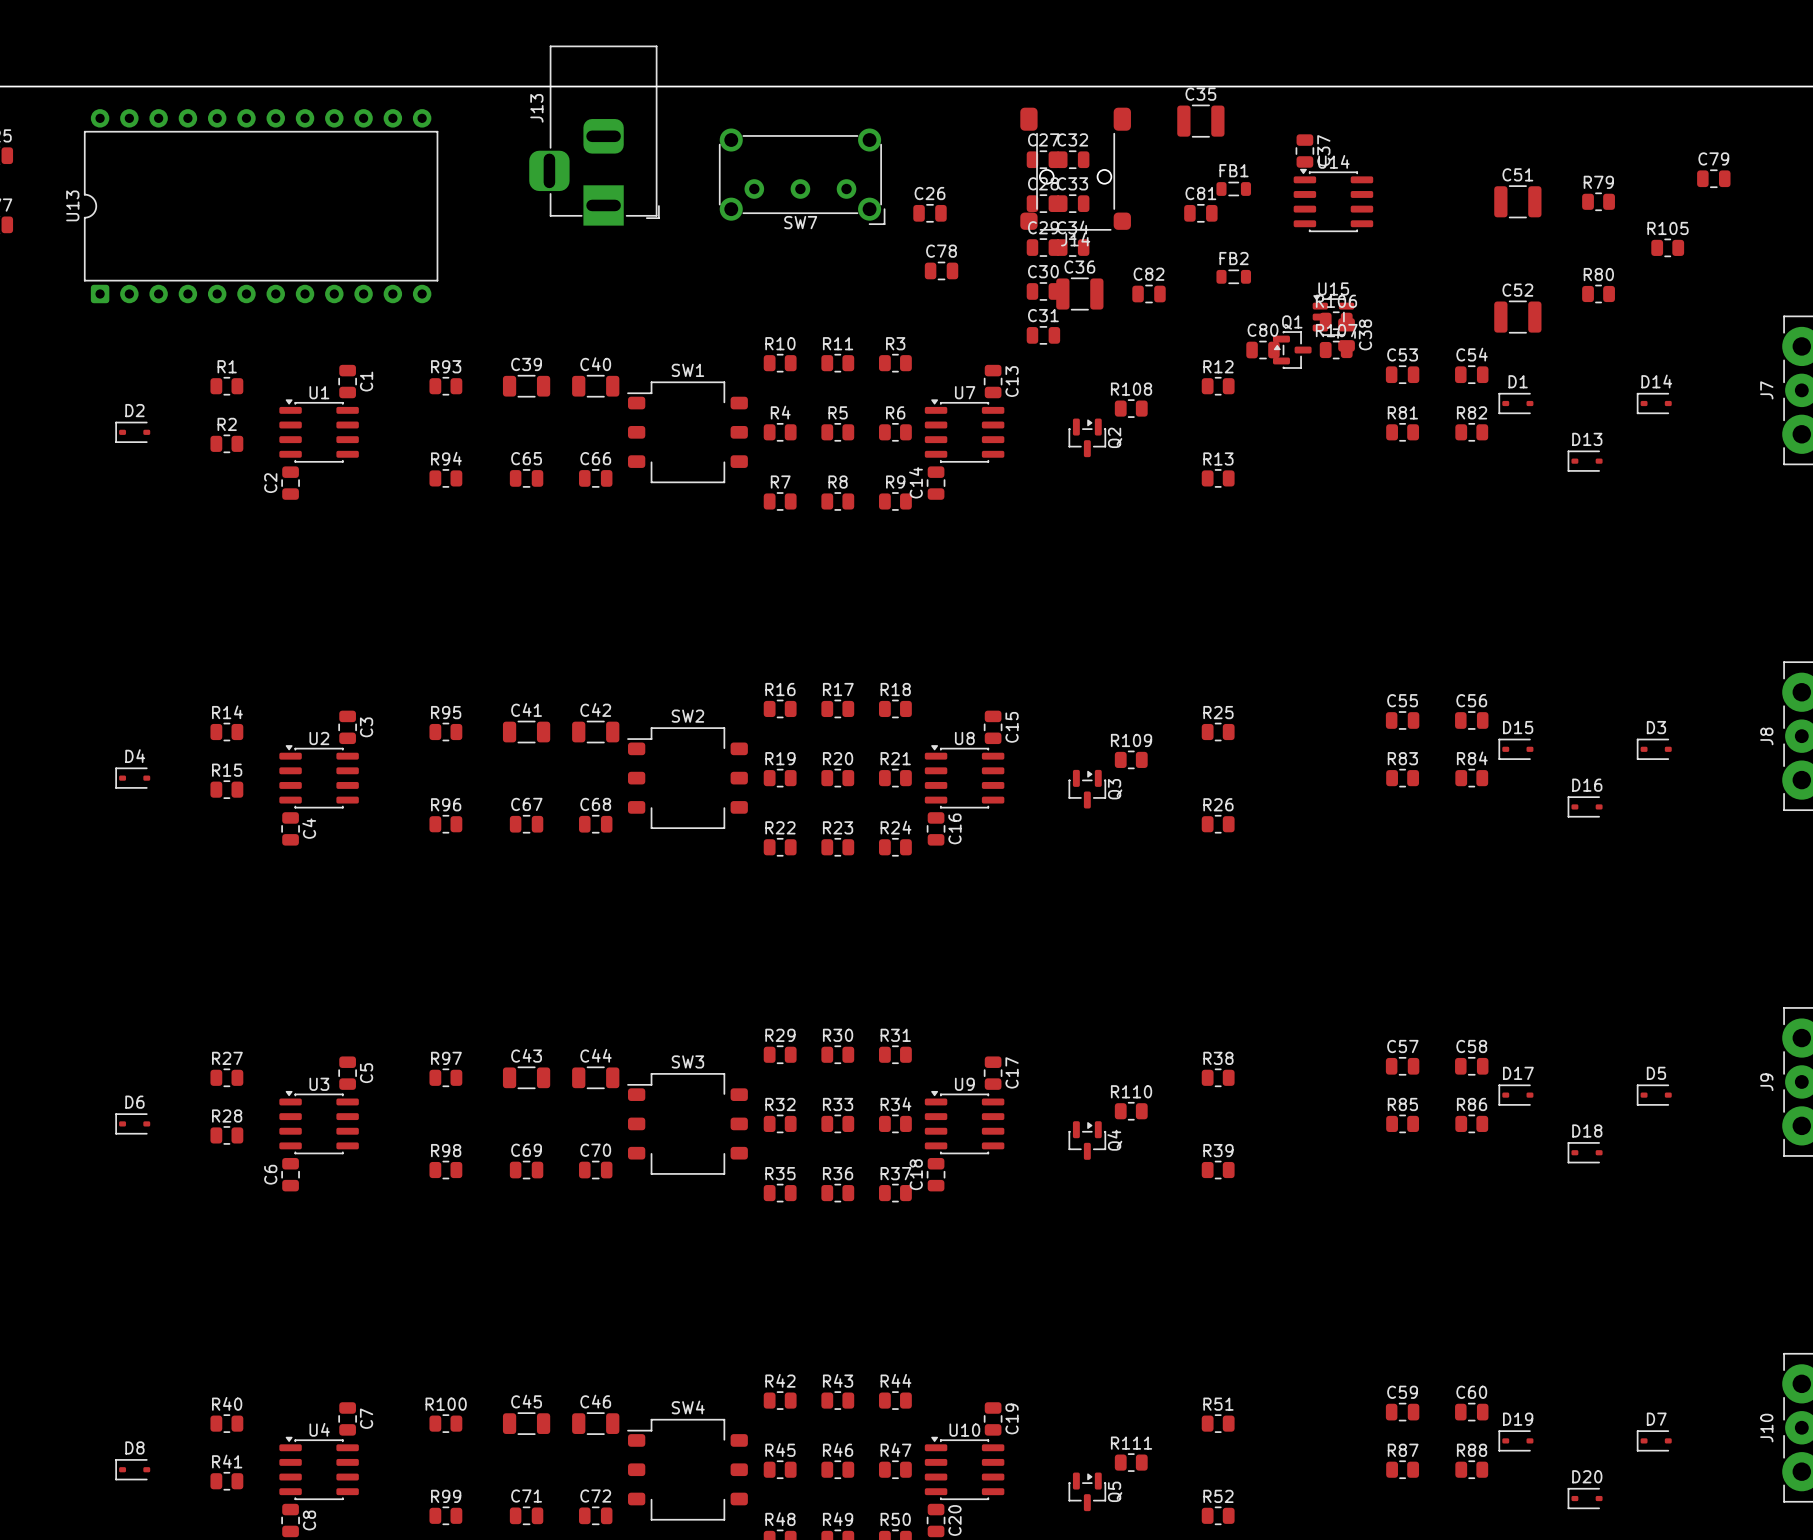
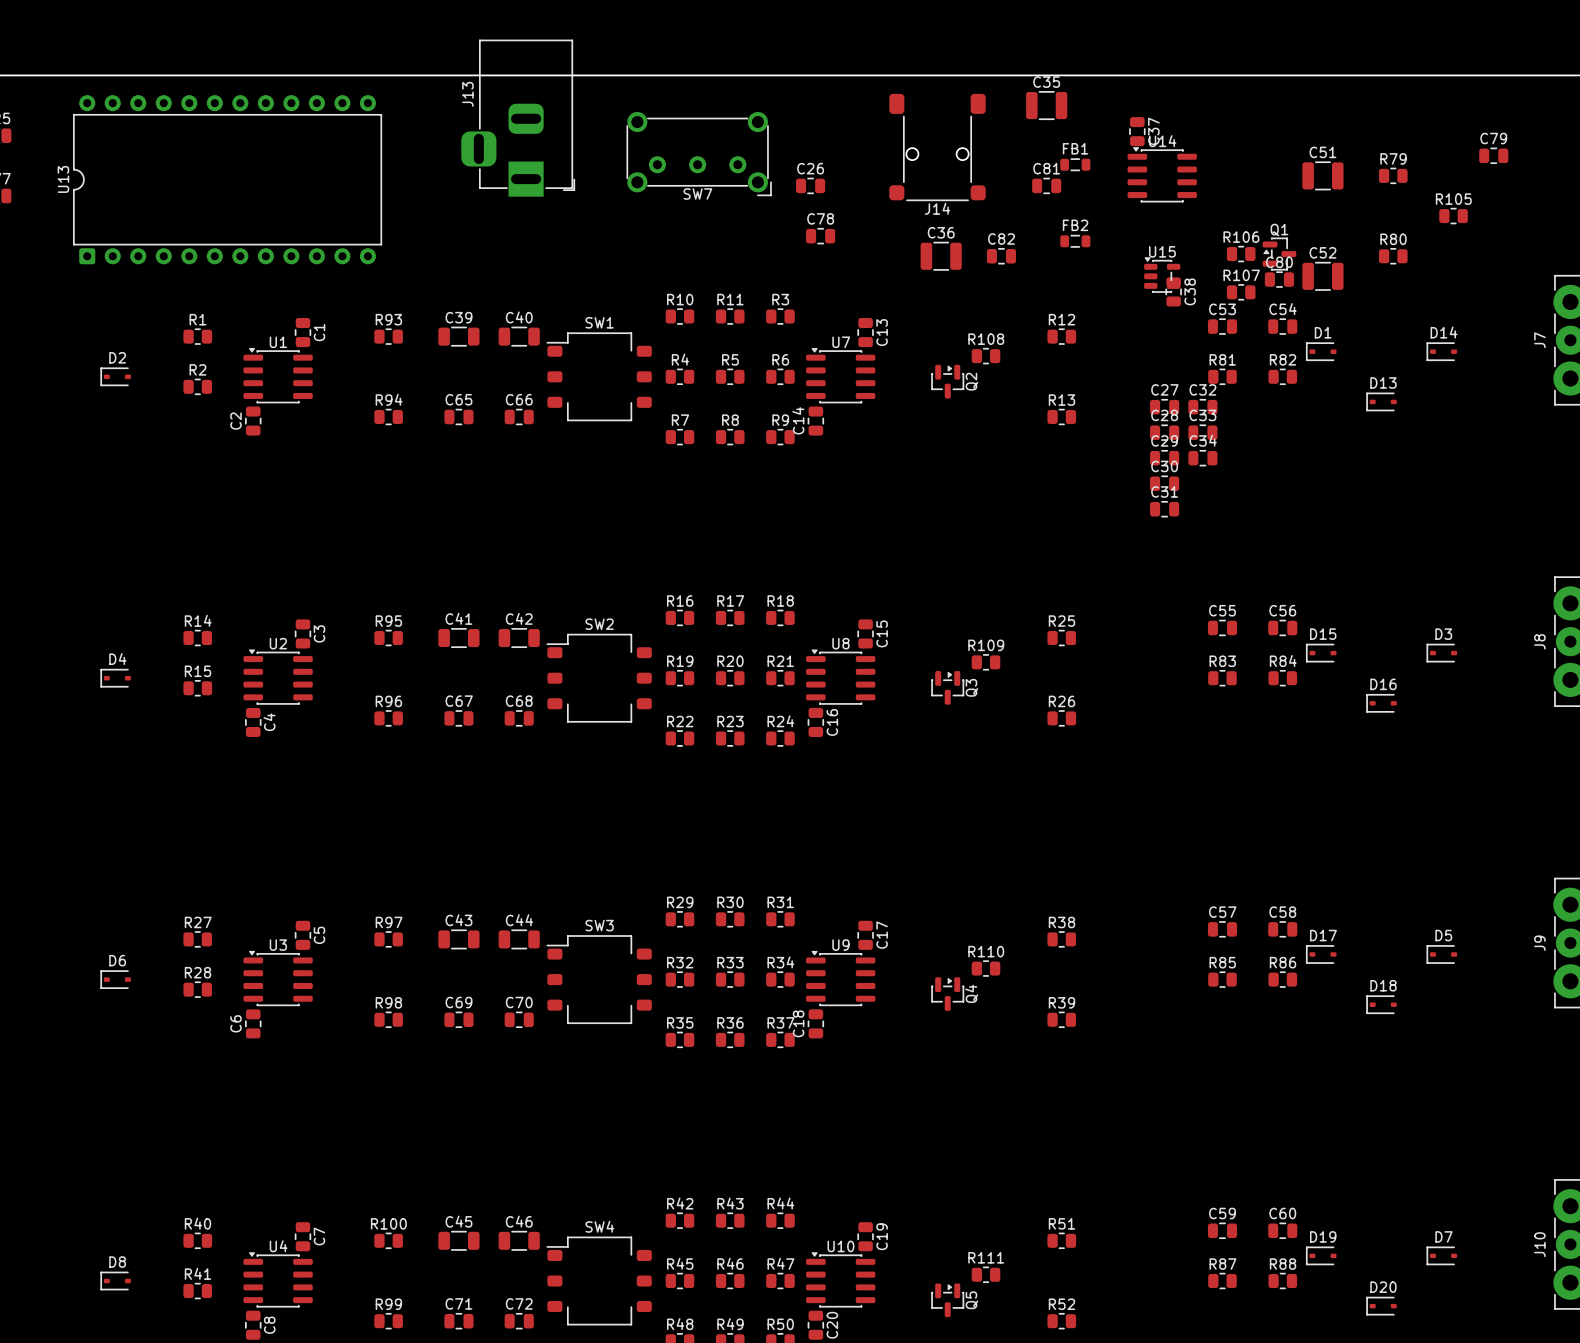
C27 position: (1043, 159) -> (1164, 407)
C32 position: (1072, 159) -> (1202, 407)
C28 position: (1043, 203) -> (1164, 432)
C33 position: (1072, 203) -> (1202, 432)
C29 position: (1043, 247) -> (1164, 458)
C34 position: (1072, 247) -> (1202, 458)
C30 position: (1043, 291) -> (1164, 483)
R106 position: (1336, 320) -> (1241, 254)
C31 position: (1043, 335) -> (1164, 509)
C80 position: (1263, 350) -> (1279, 279)
Q1 position: (1292, 350) -> (1279, 254)
R107 position: (1336, 350) -> (1241, 292)

